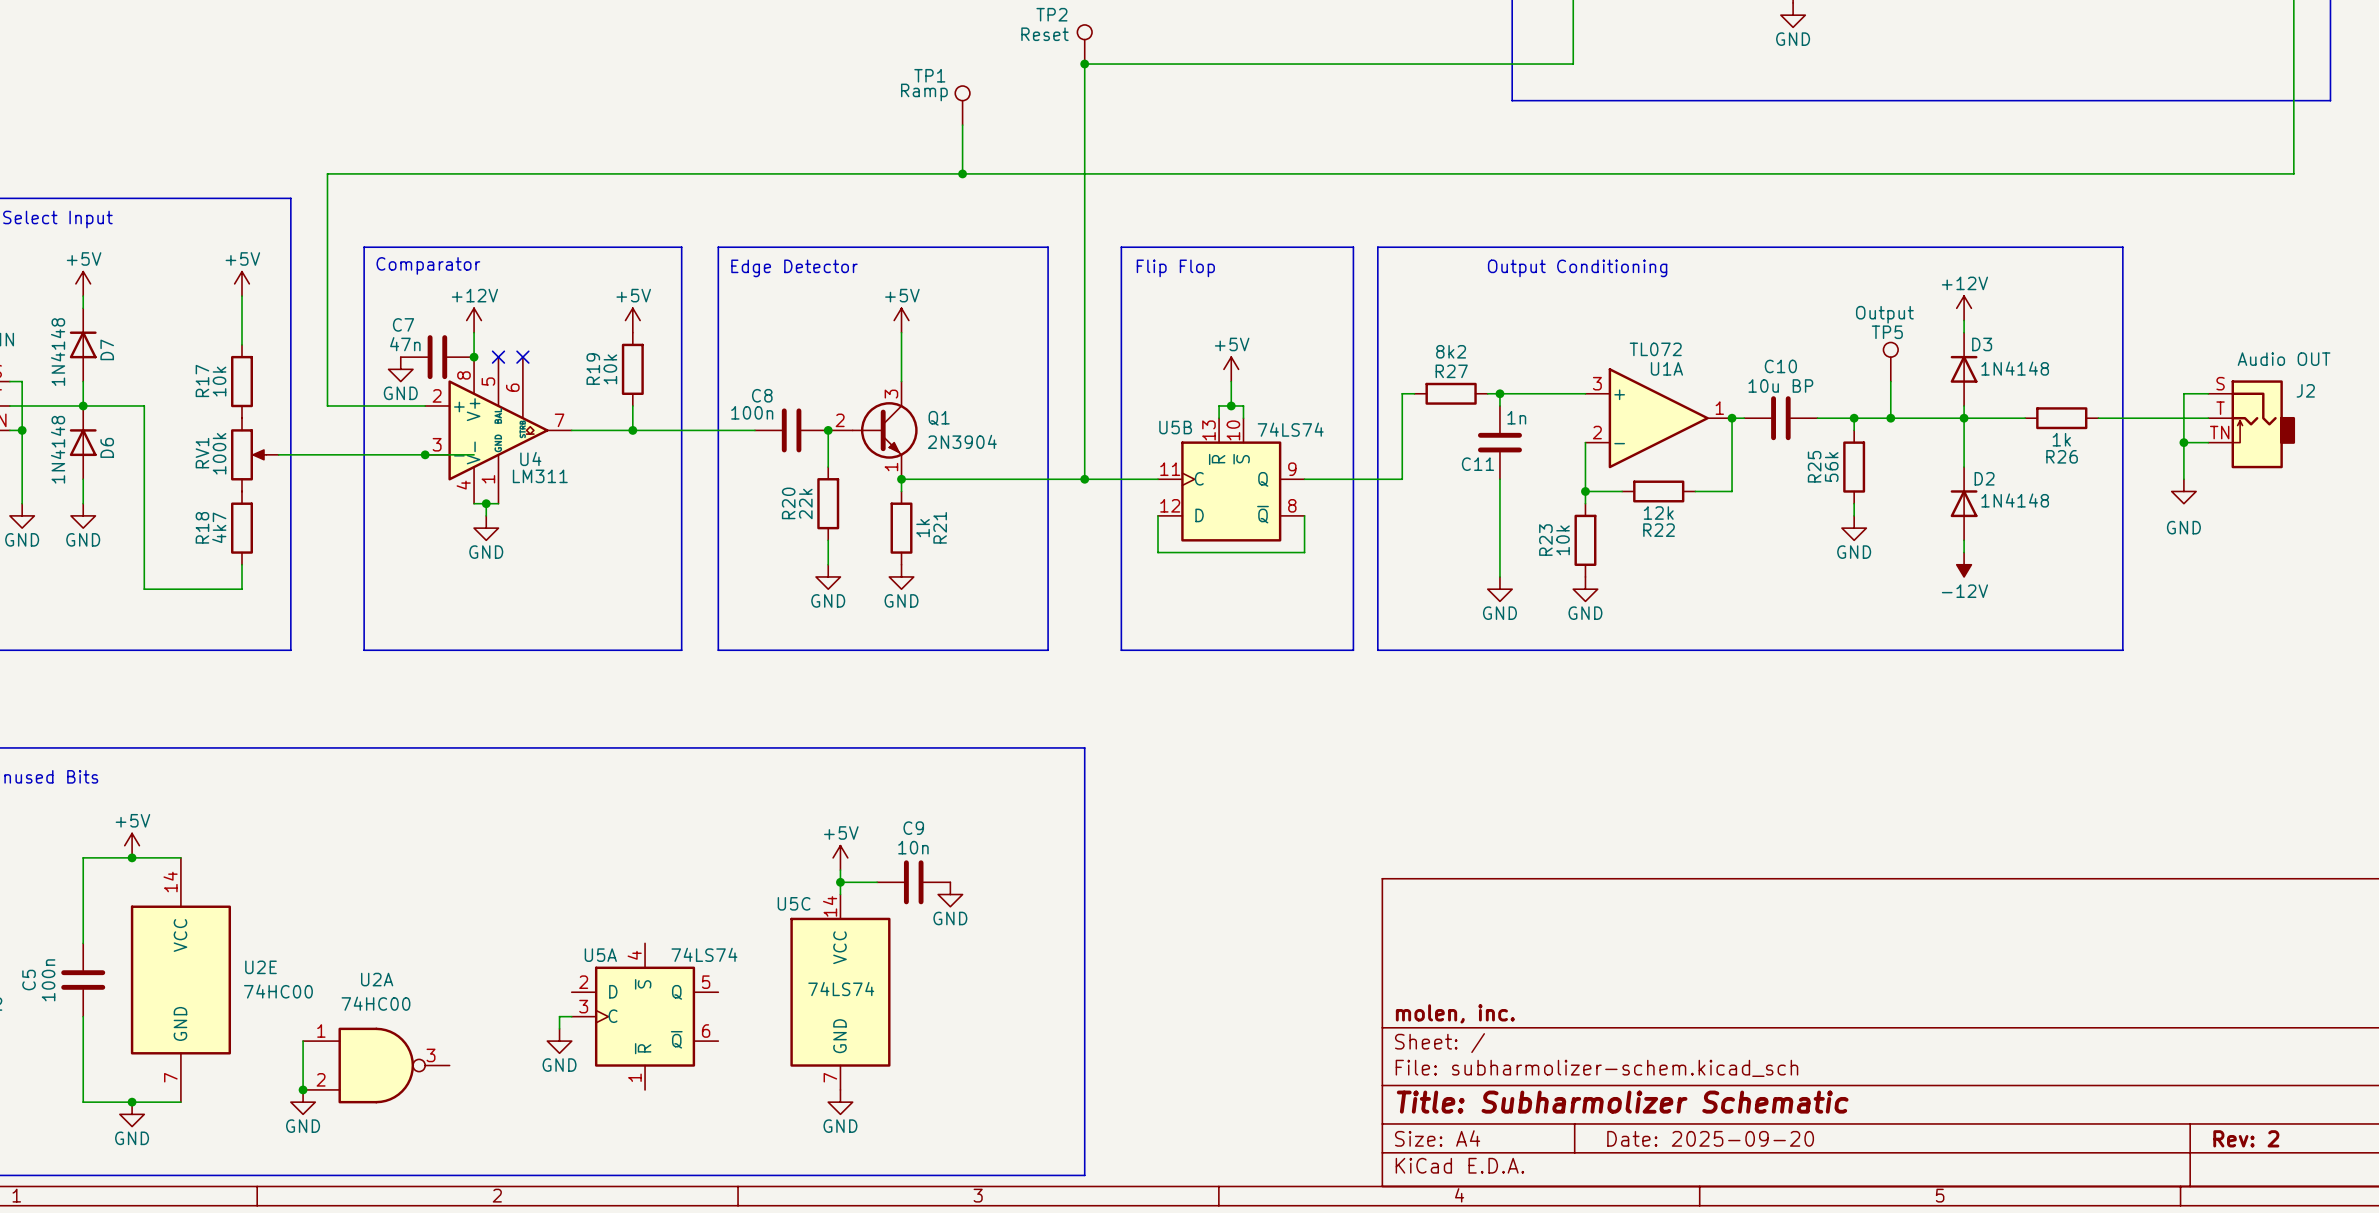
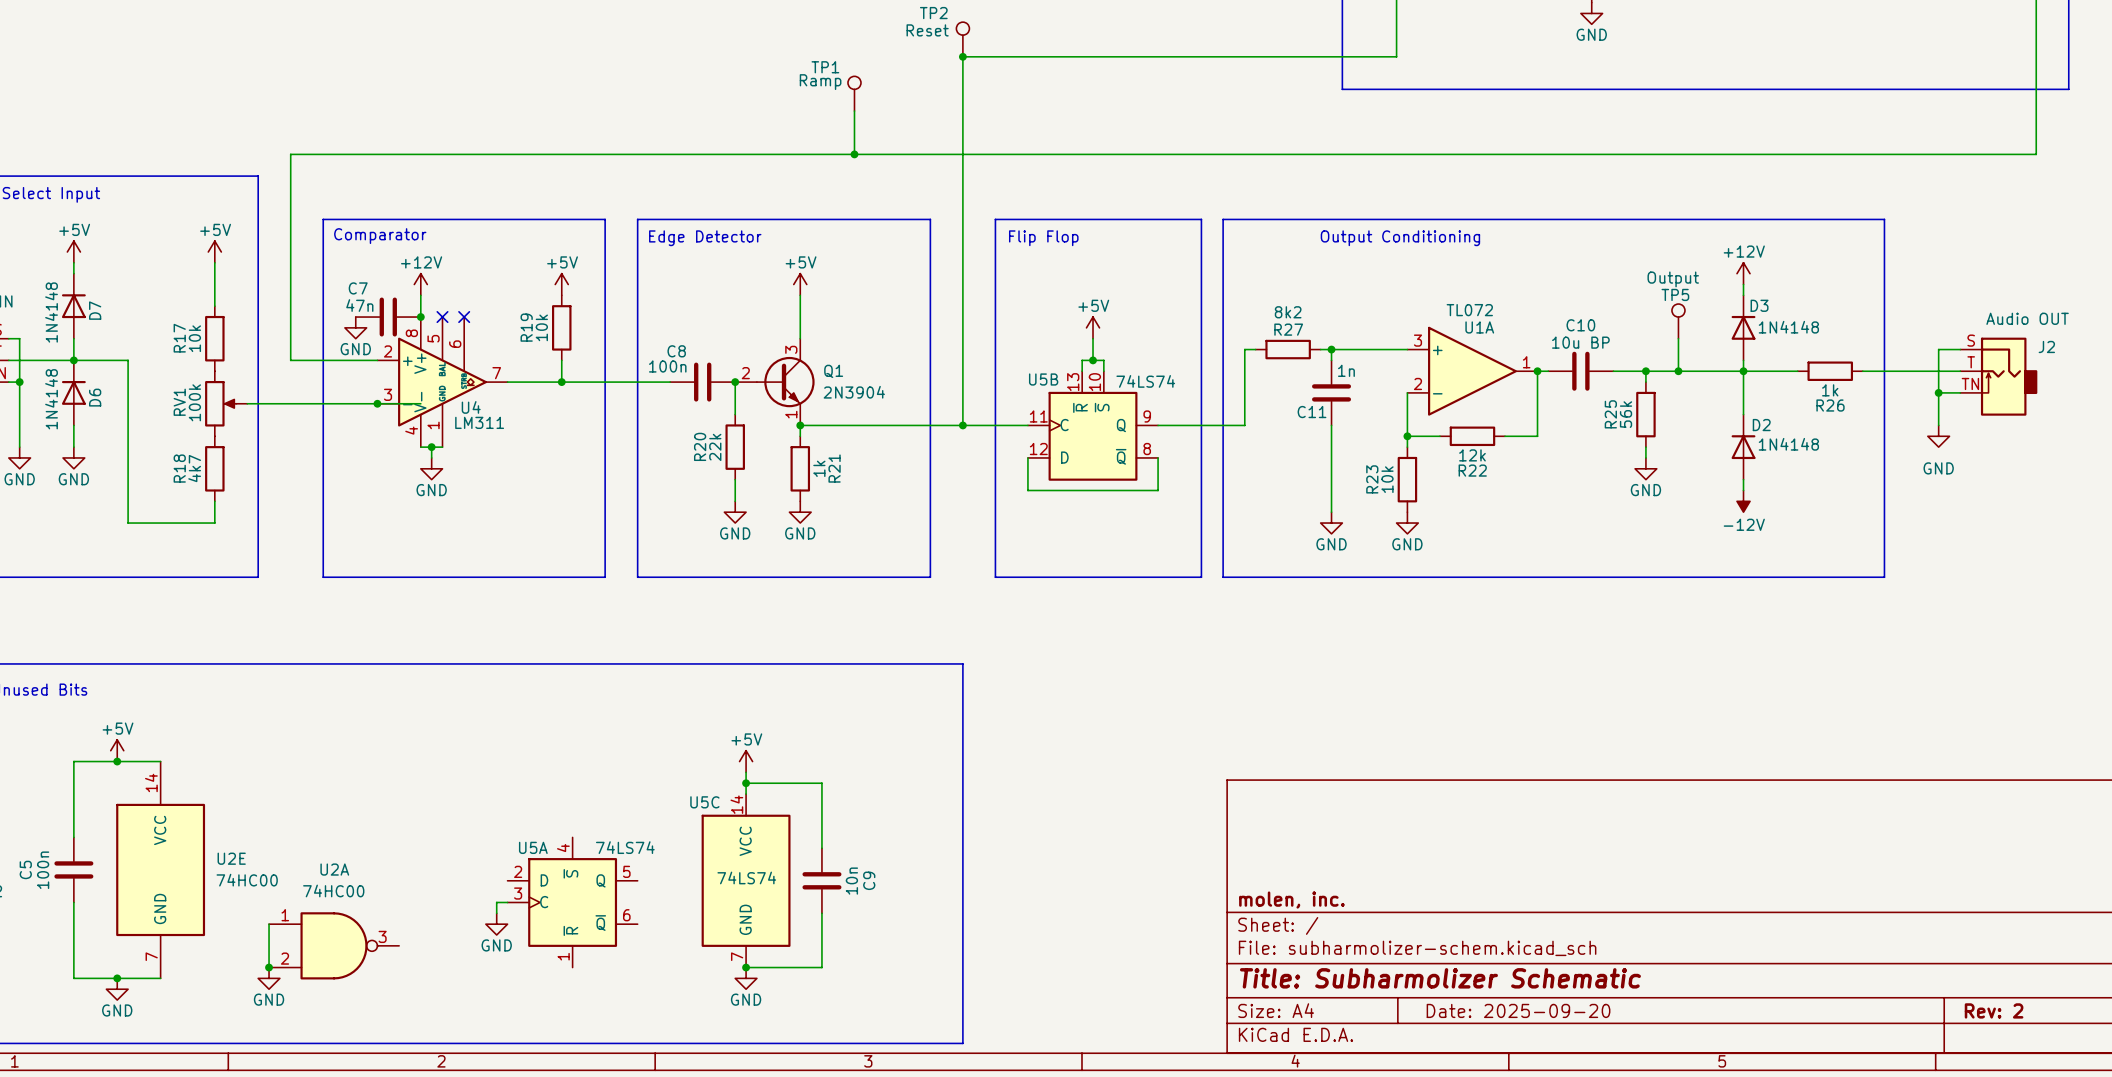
wire: none -> (778, 783) (821, 783) (821, 848)
C9 rotation: 0° (913, 882) -> 90° clockwise (821, 880)
C9 position: (913, 882) -> (821, 880)
power symbol: GND (950, 894) -> none
wire: none -> (821, 913) (821, 967) (746, 967)
junction: none -> (746, 967)

